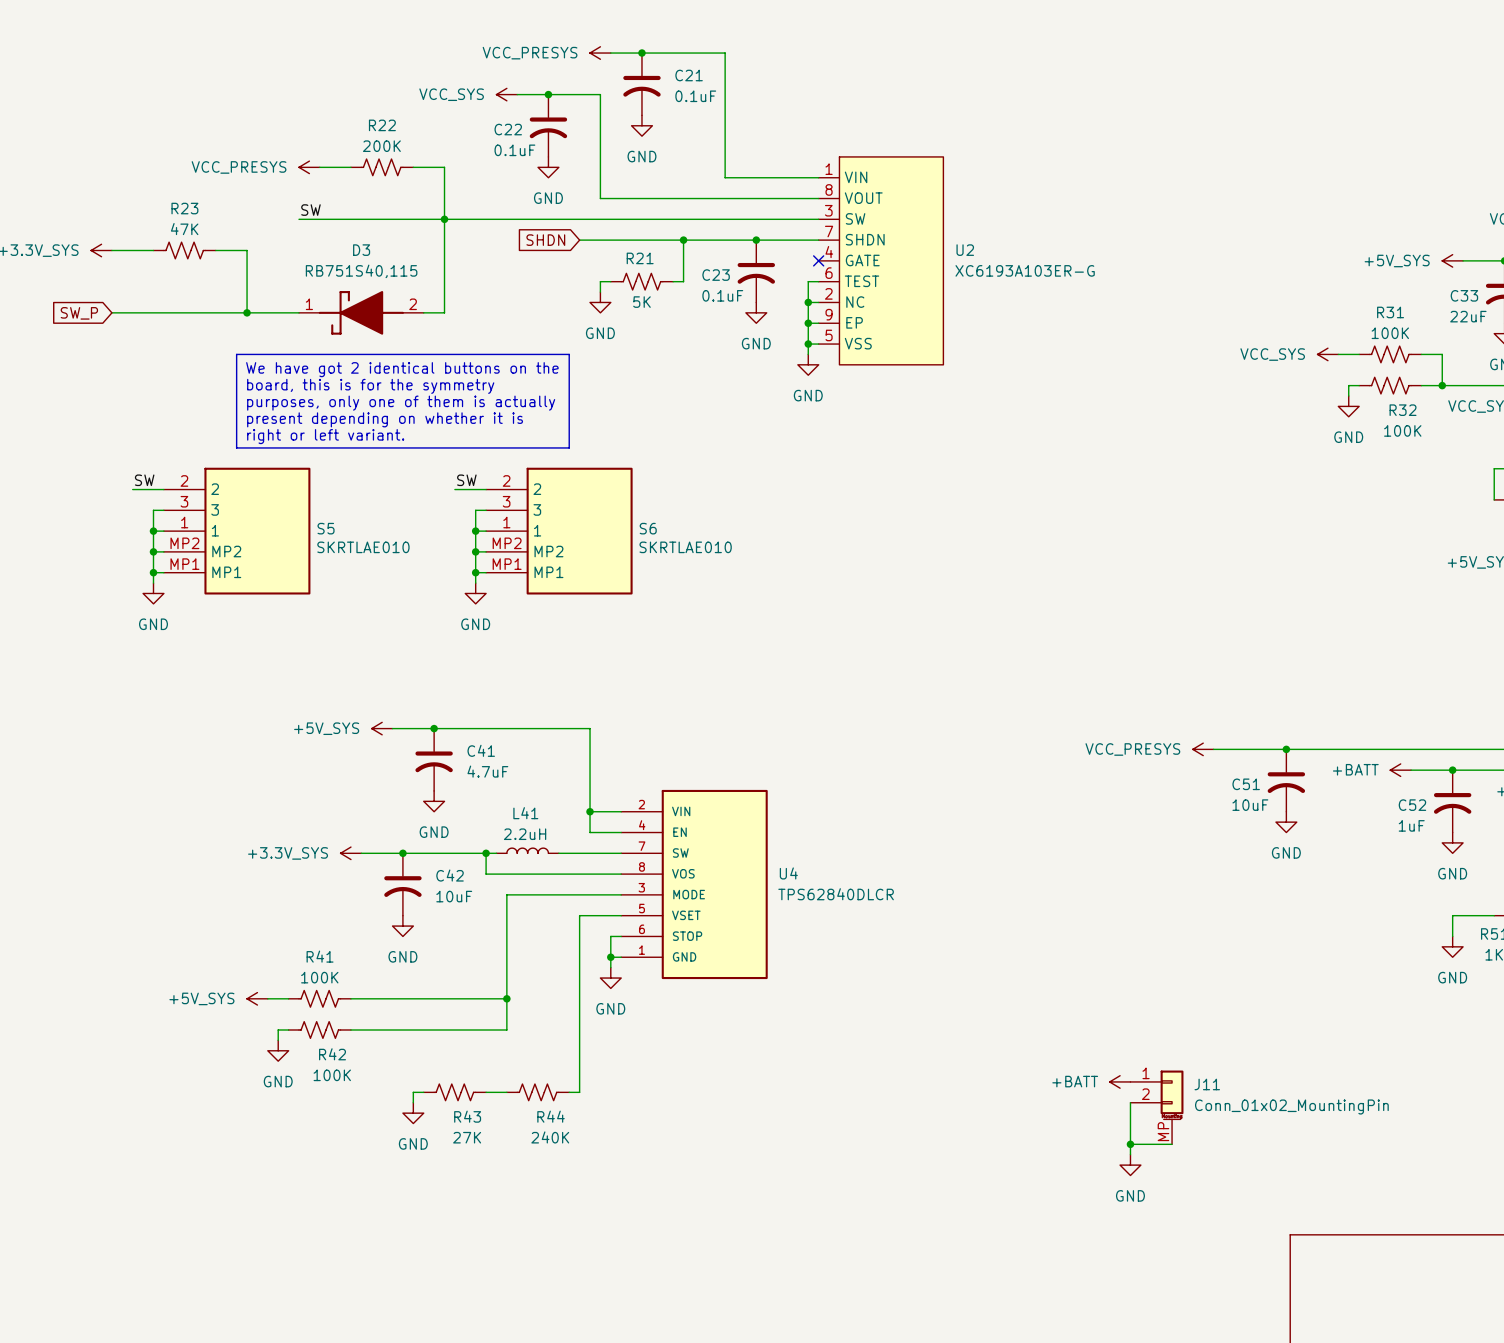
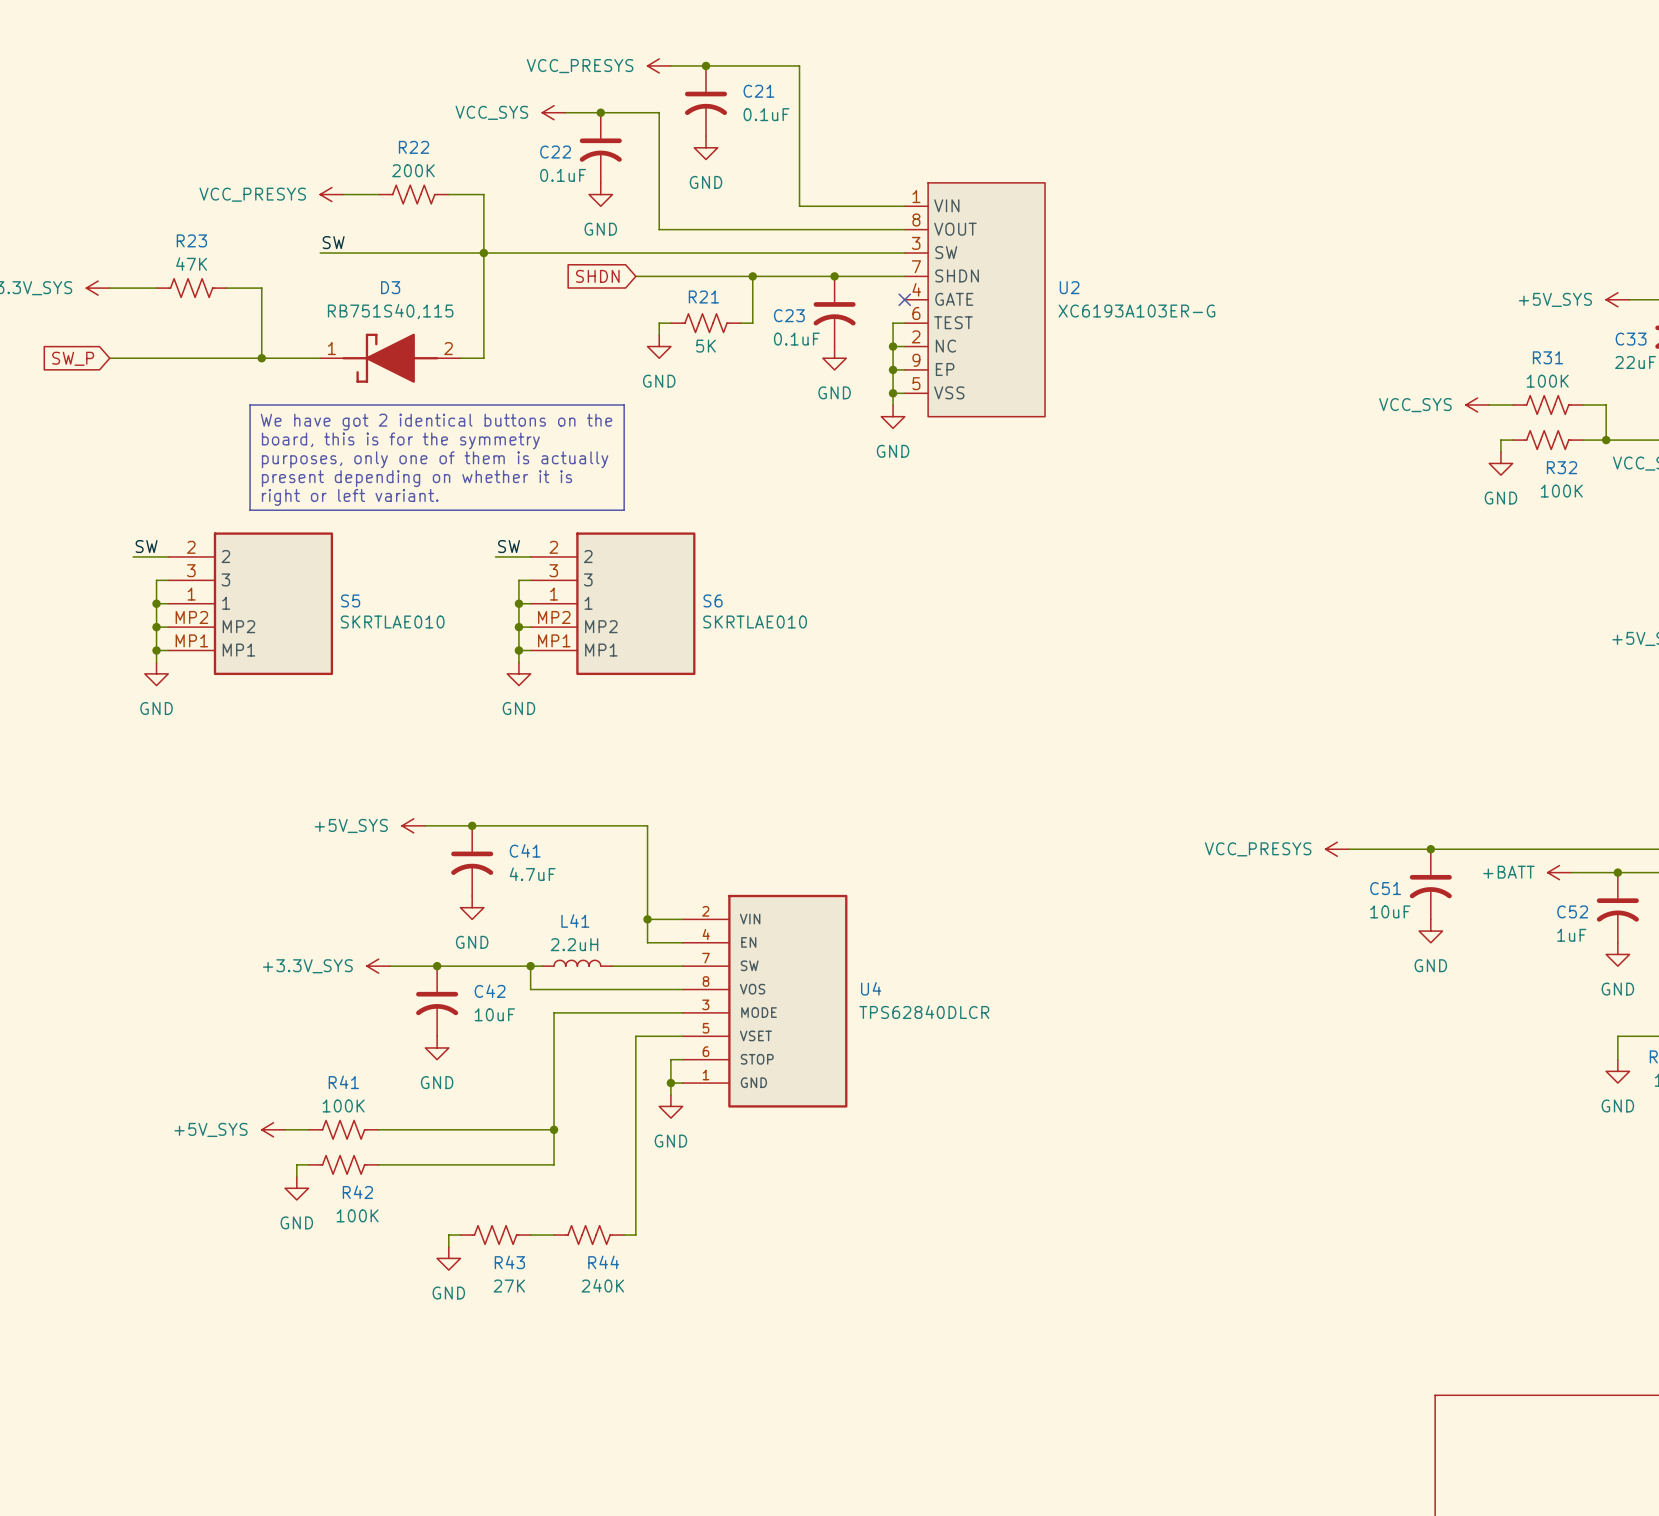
power symbol: +BATT (1120, 1081) -> none
wire: (1130, 1102) (1130, 1154) -> none
J11: Conn_01x02_MountingPin (1156, 1107) -> none
wire: (1130, 1144) (1172, 1144) -> none
junction: (1130, 1144) -> none
power symbol: GND (1130, 1165) -> none

